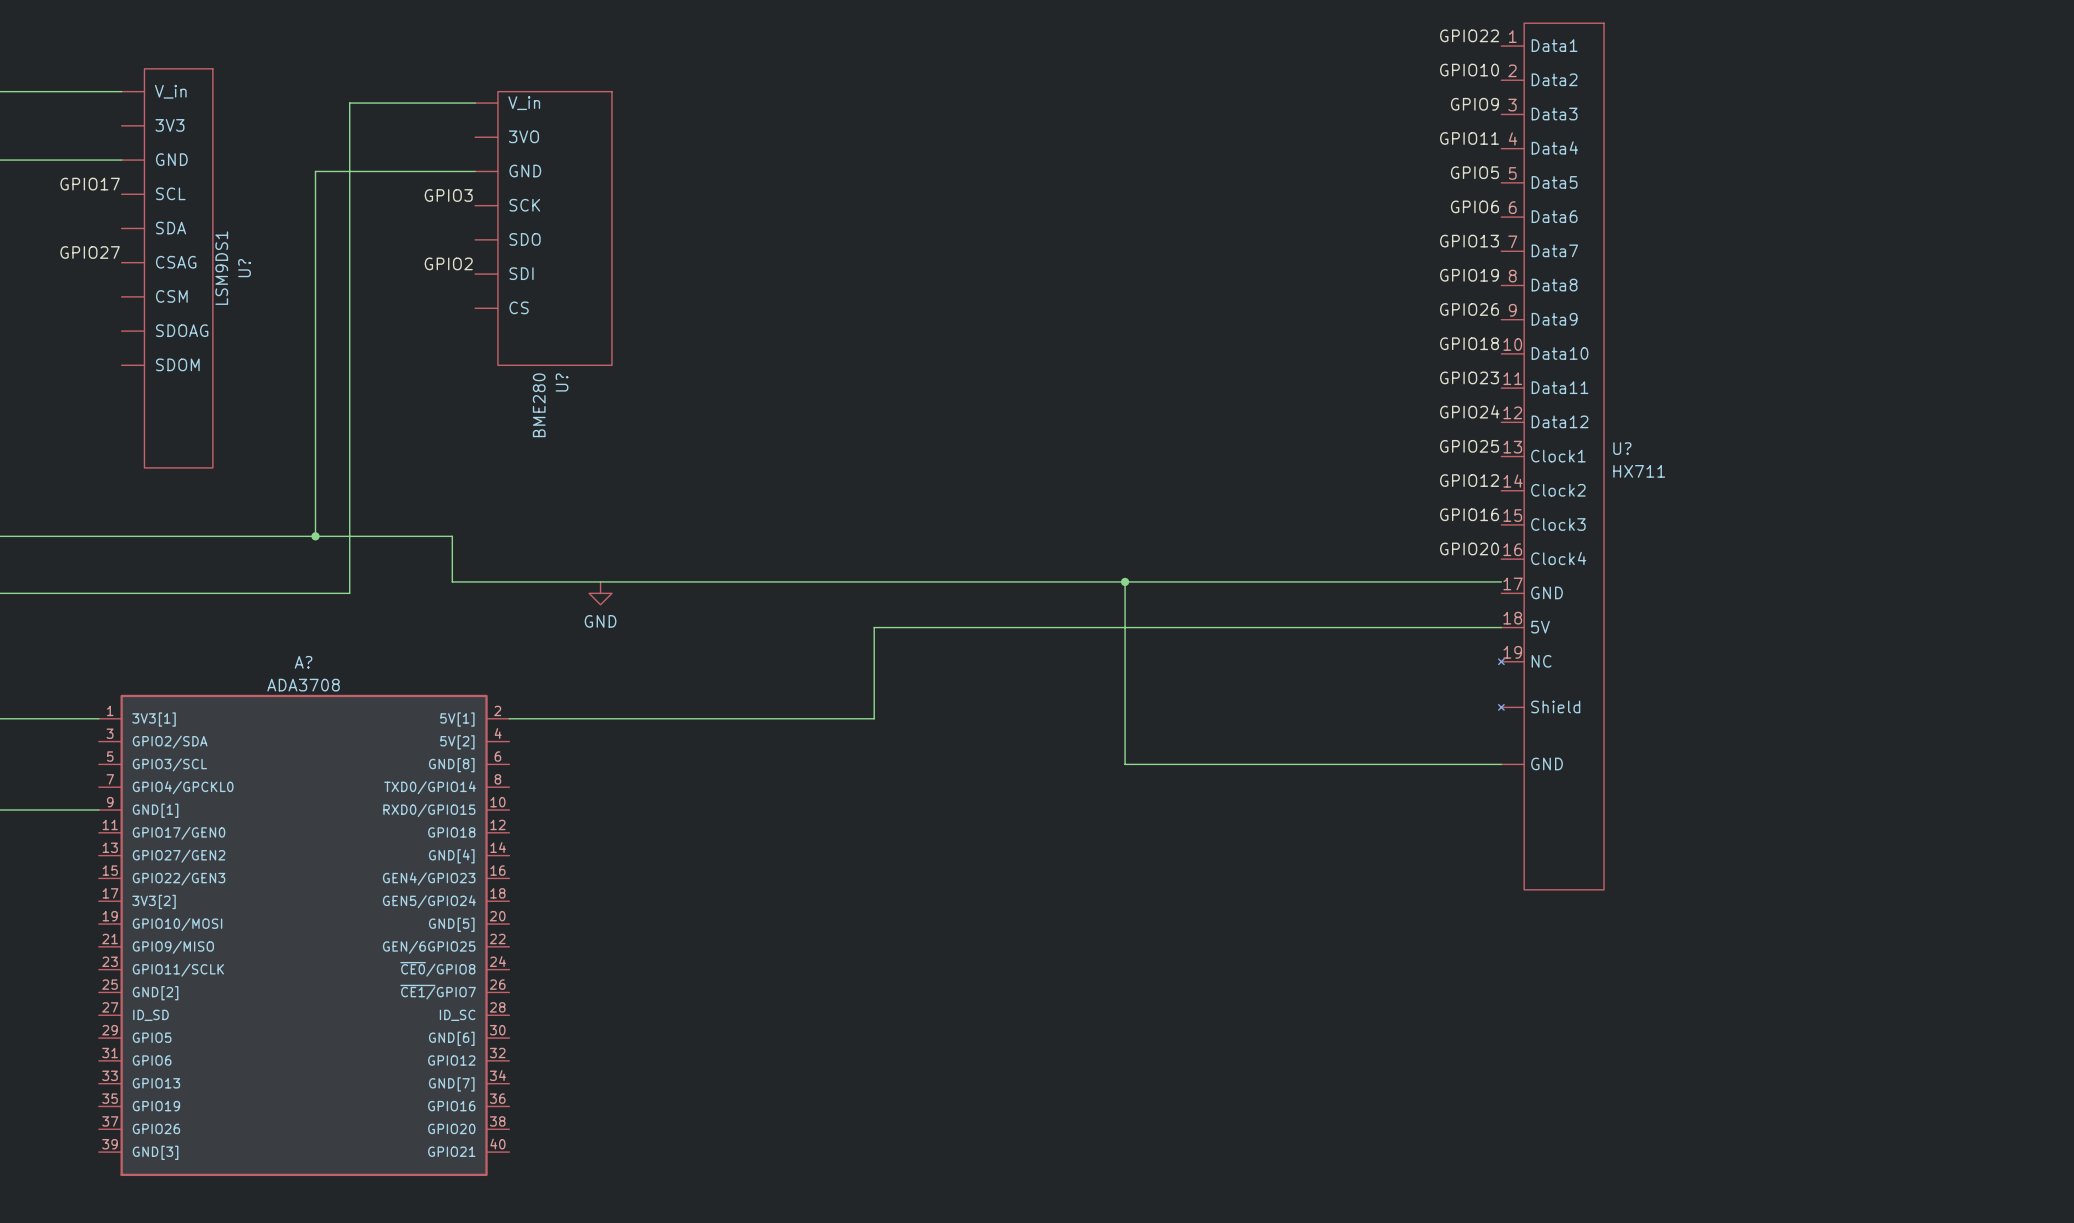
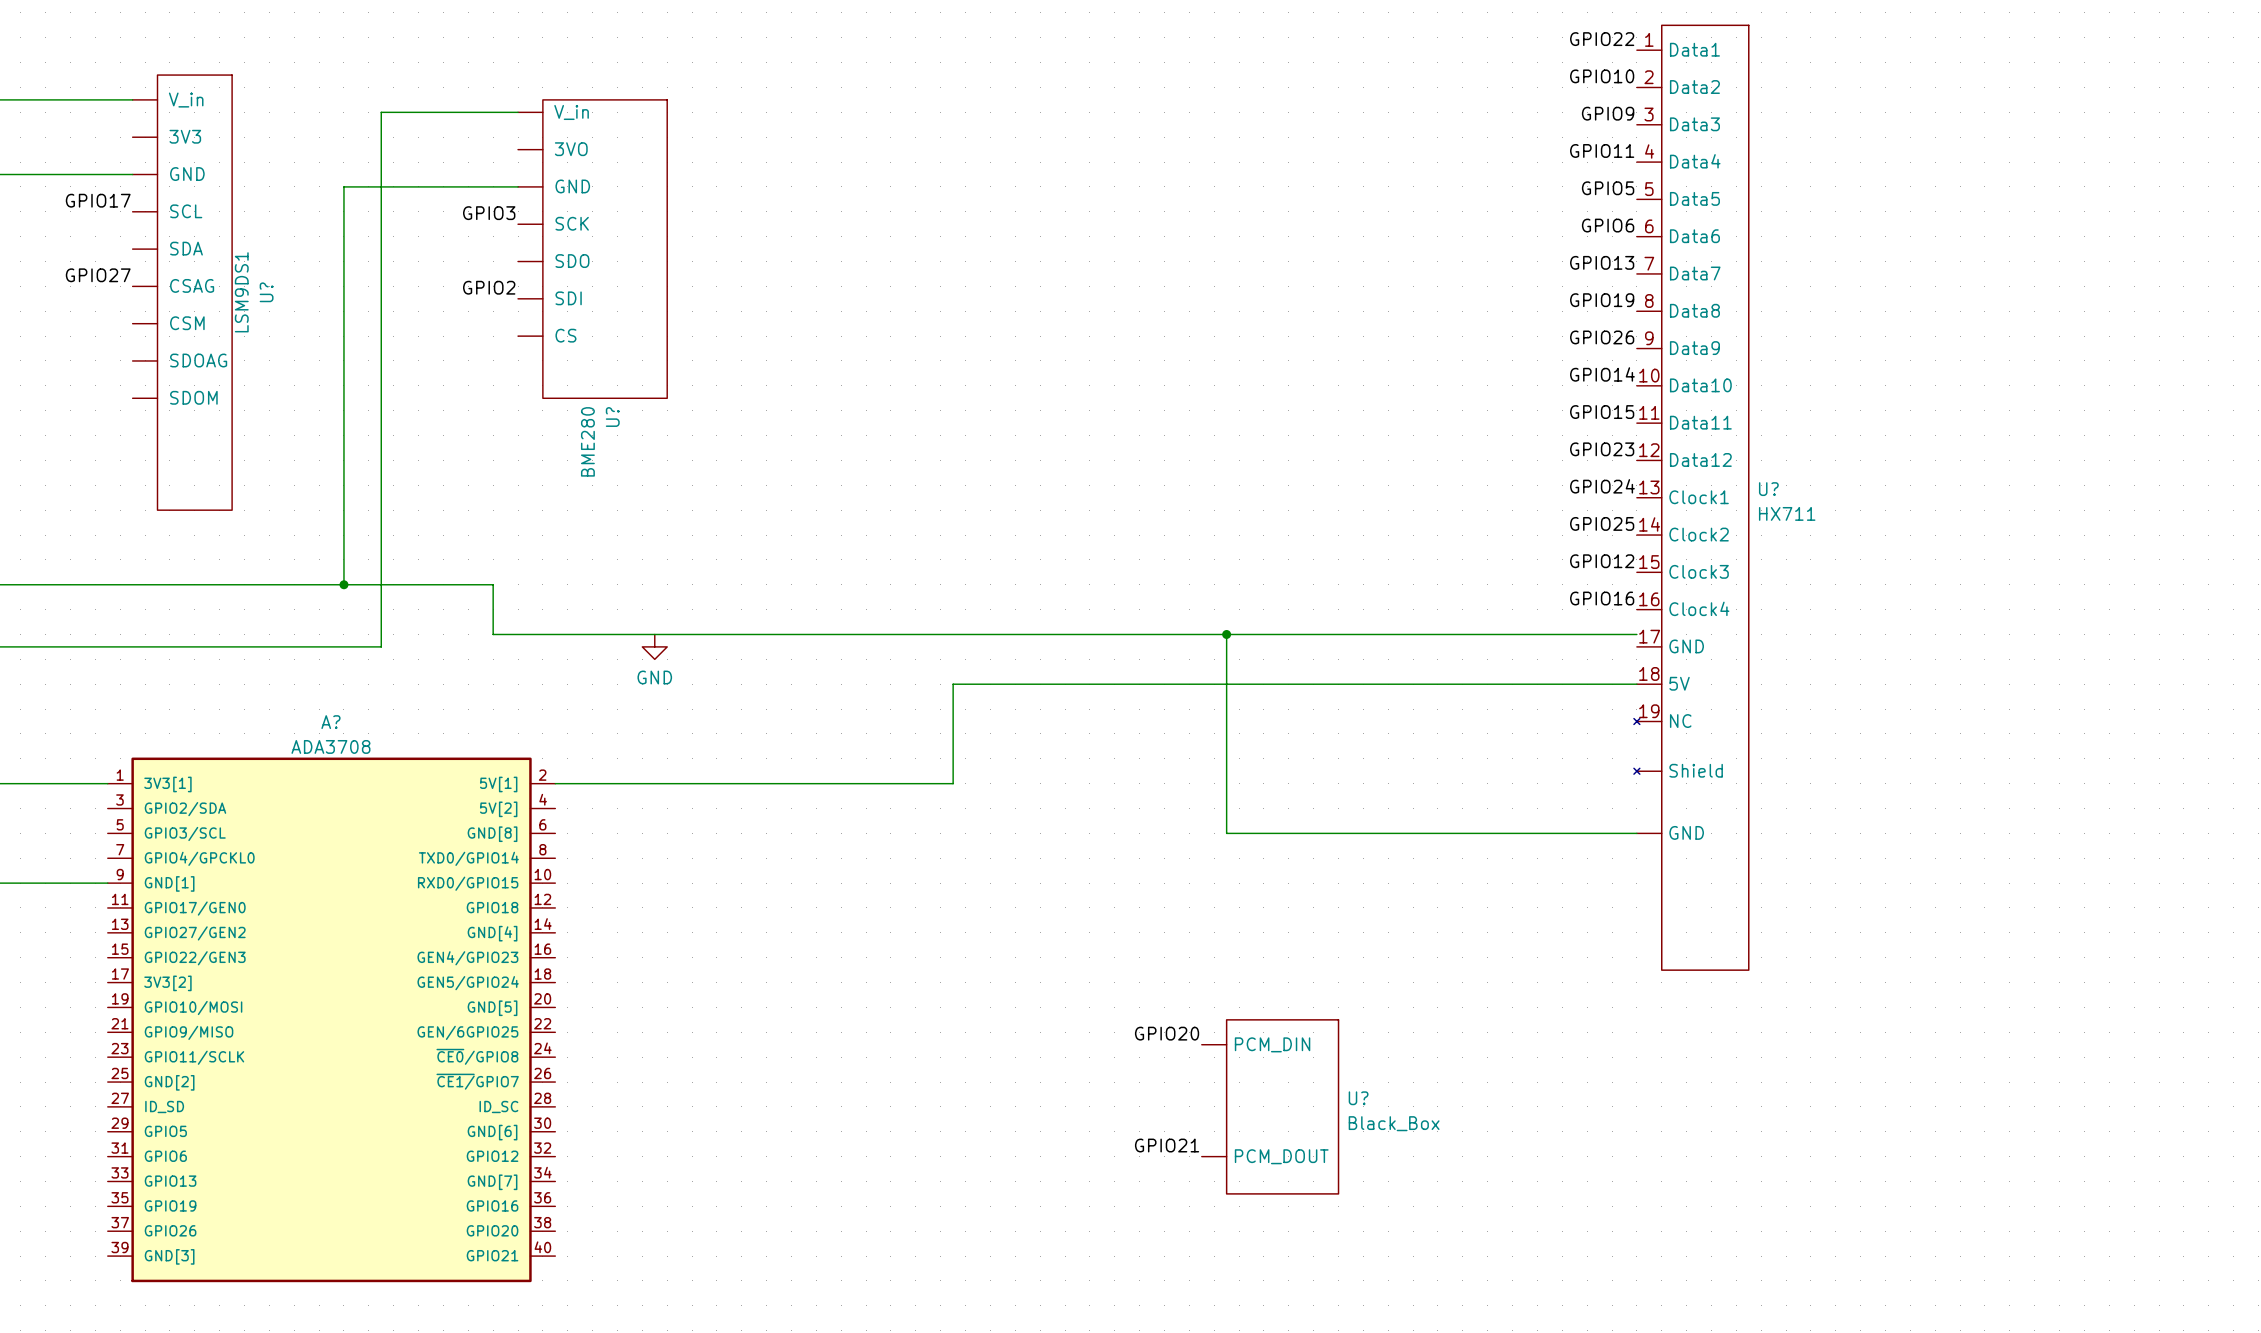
label: GPIO18 (1469, 343) -> GPIO14 (1602, 374)
label: GPIO23 (1469, 377) -> GPIO15 (1602, 412)
label: GPIO24 (1469, 411) -> GPIO23 (1602, 449)
label: GPIO25 (1469, 446) -> GPIO24 (1602, 486)
label: GPIO12 (1469, 480) -> GPIO25 (1602, 523)
label: GPIO16 (1469, 514) -> GPIO12 (1602, 561)
label: GPIO20 (1469, 548) -> GPIO16 (1602, 598)
label: none -> GPIO20 (1167, 1033)
U?: none -> Black_Box (1270, 1106)
label: none -> GPIO21 (1167, 1145)

